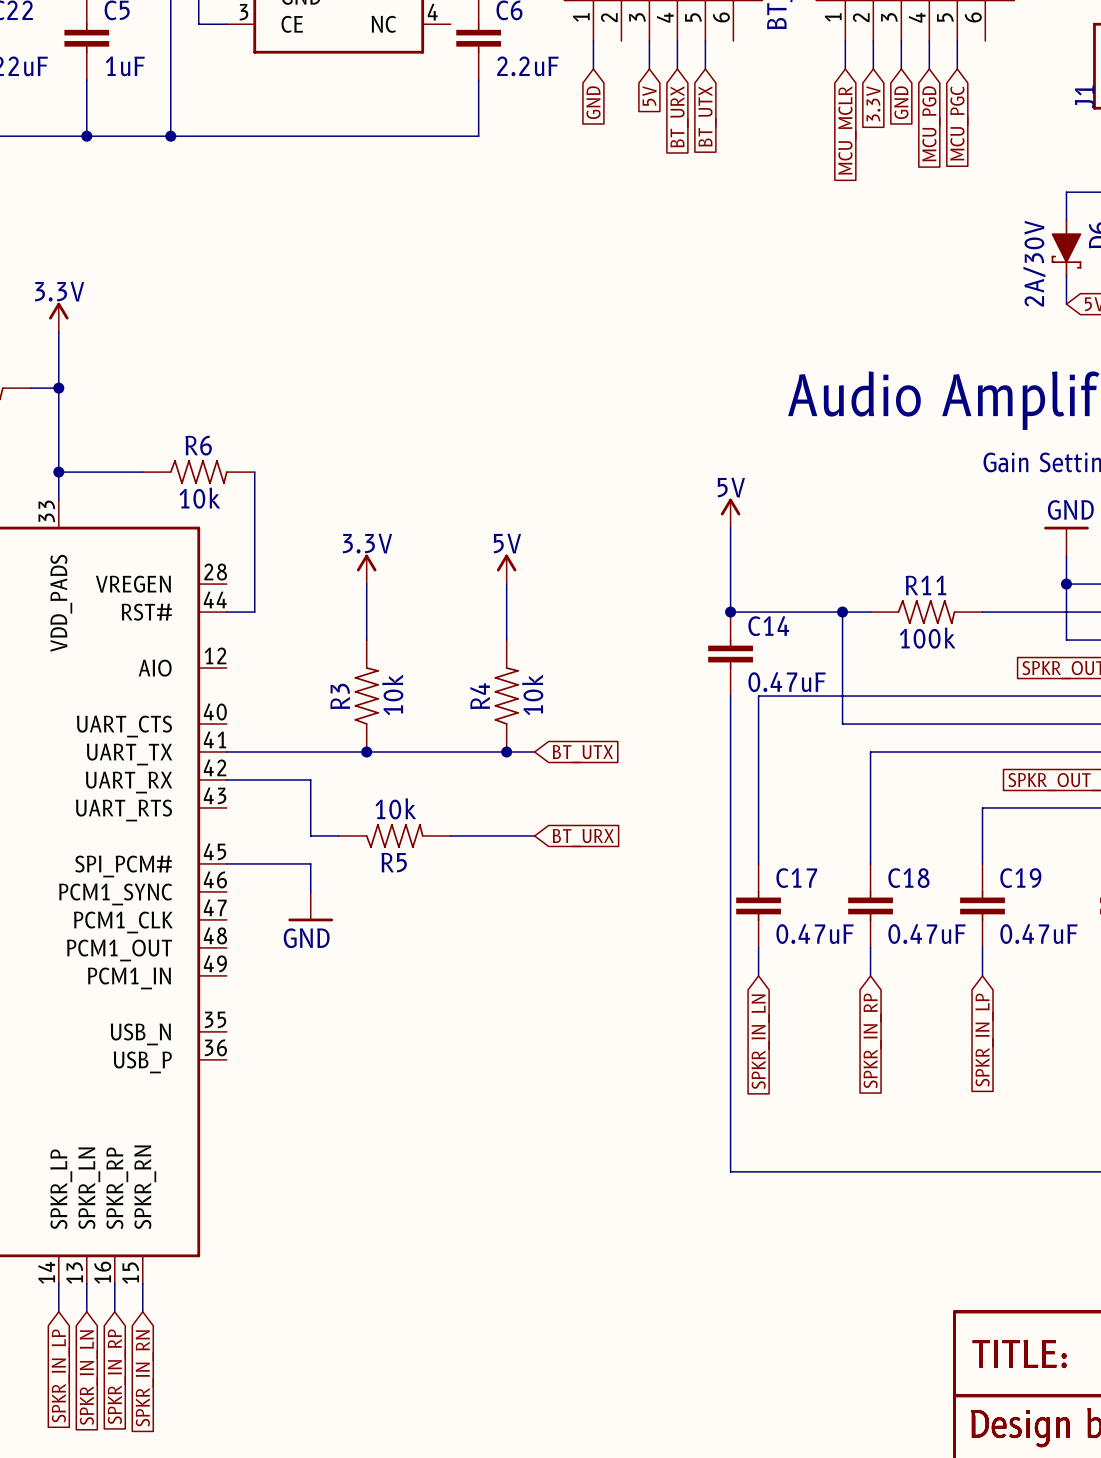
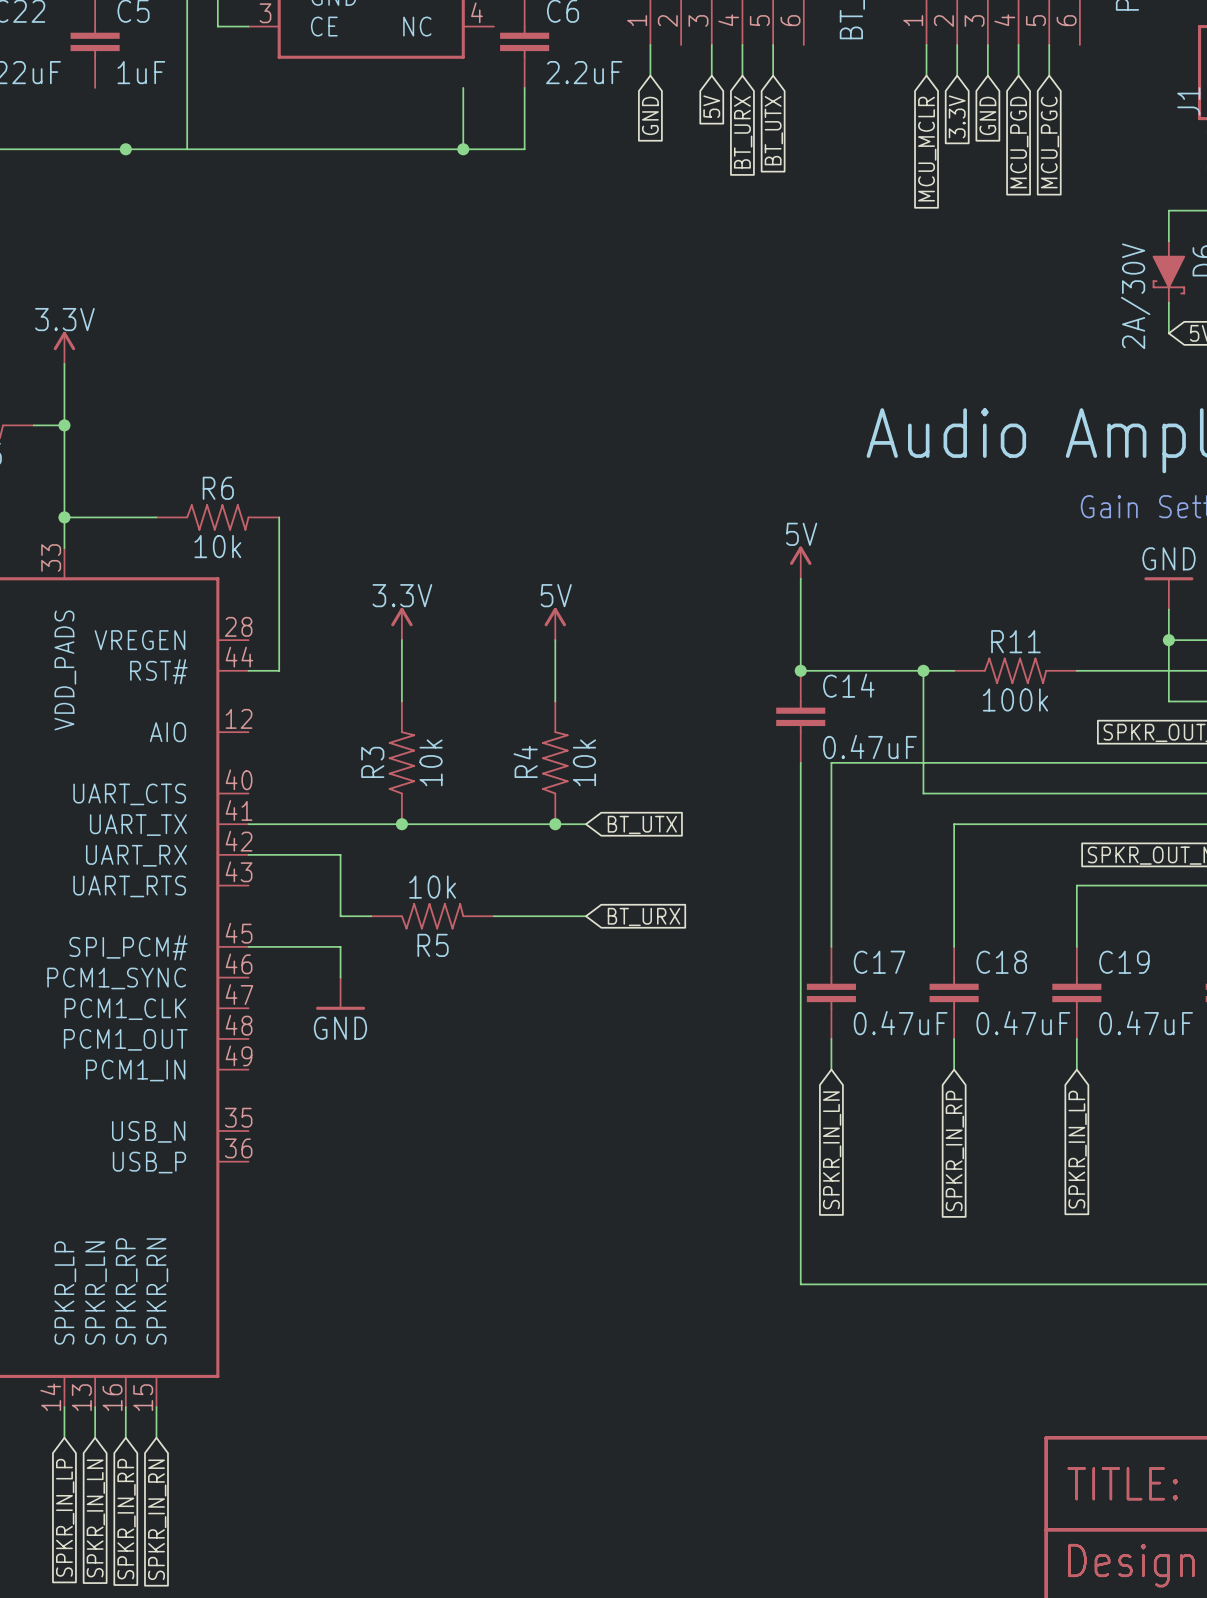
wire: (86, 80) (86, 136) -> none
wire: none -> (463, 87) (463, 149)
junction: (86, 136) -> none
junction: none -> (125, 149)
junction: (170, 136) -> none
junction: none -> (463, 149)

